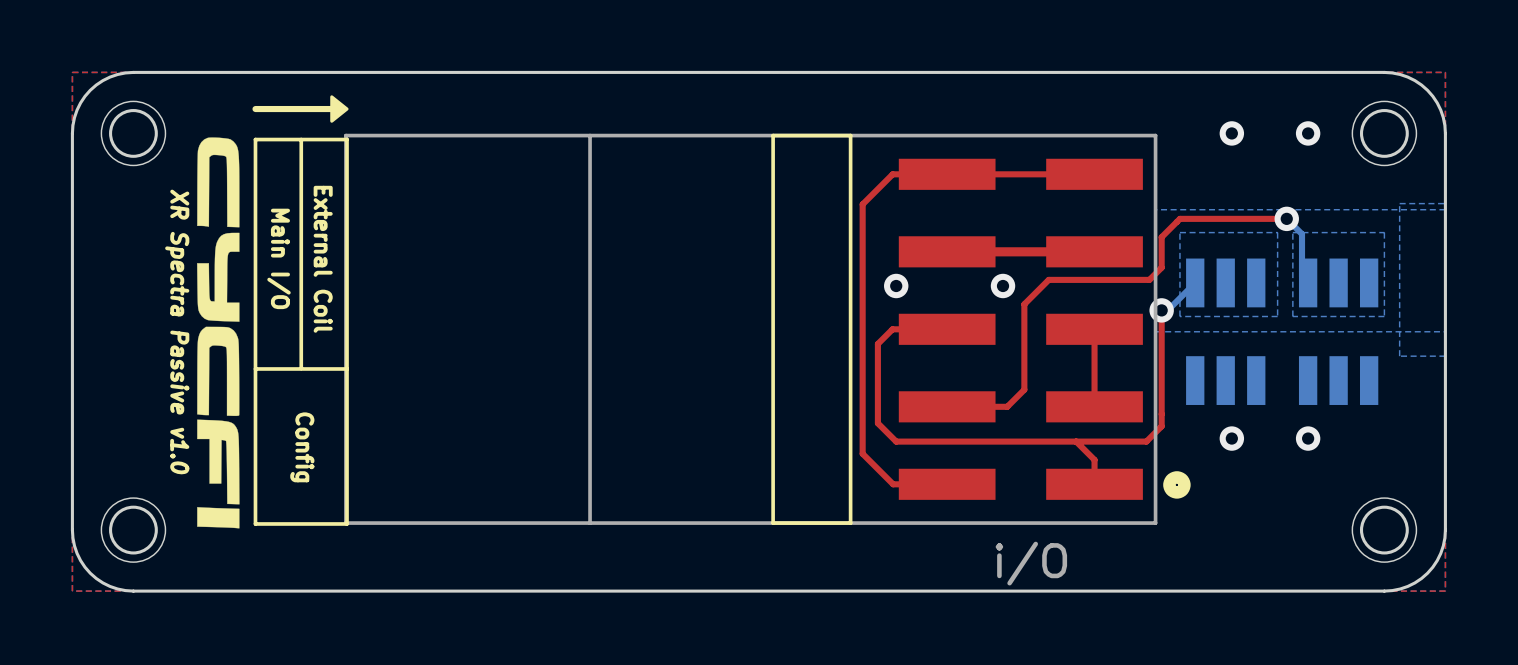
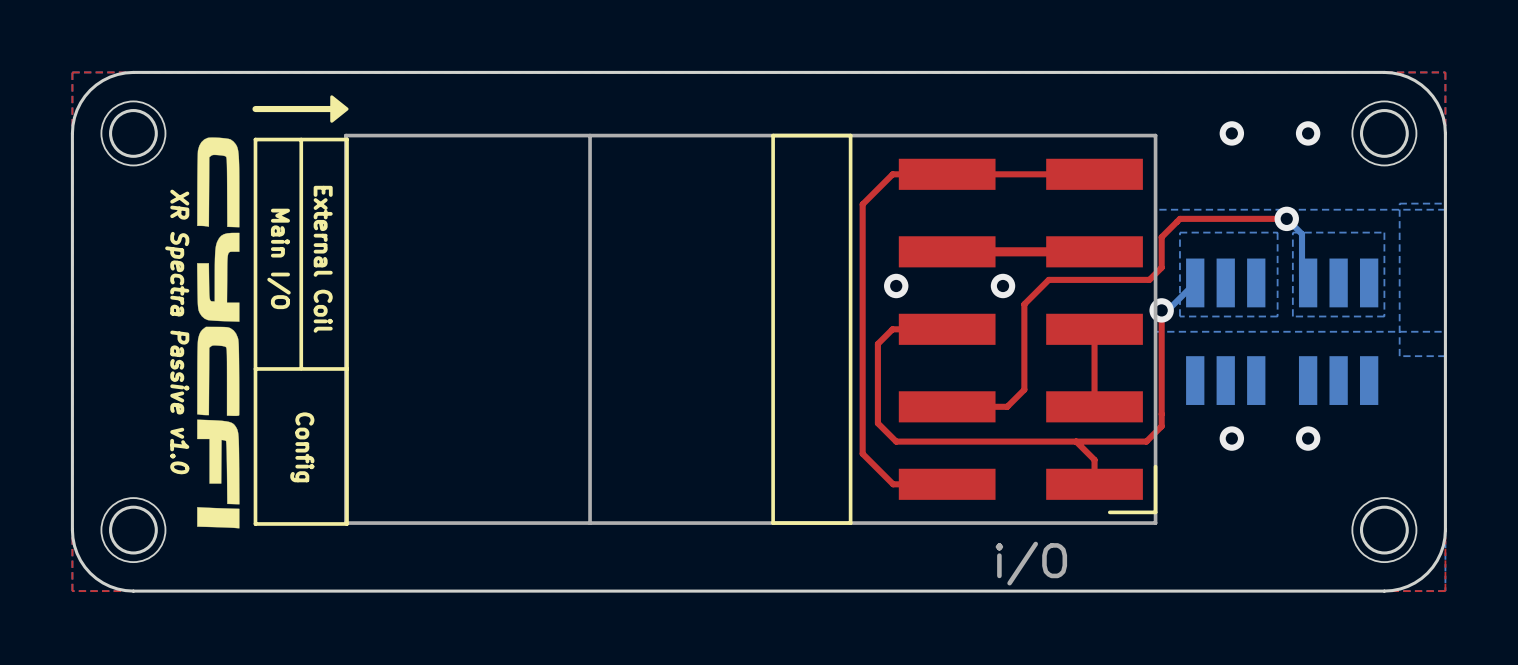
part footprint: [344, 133, 1191, 525] -> [344, 133, 1158, 525]

